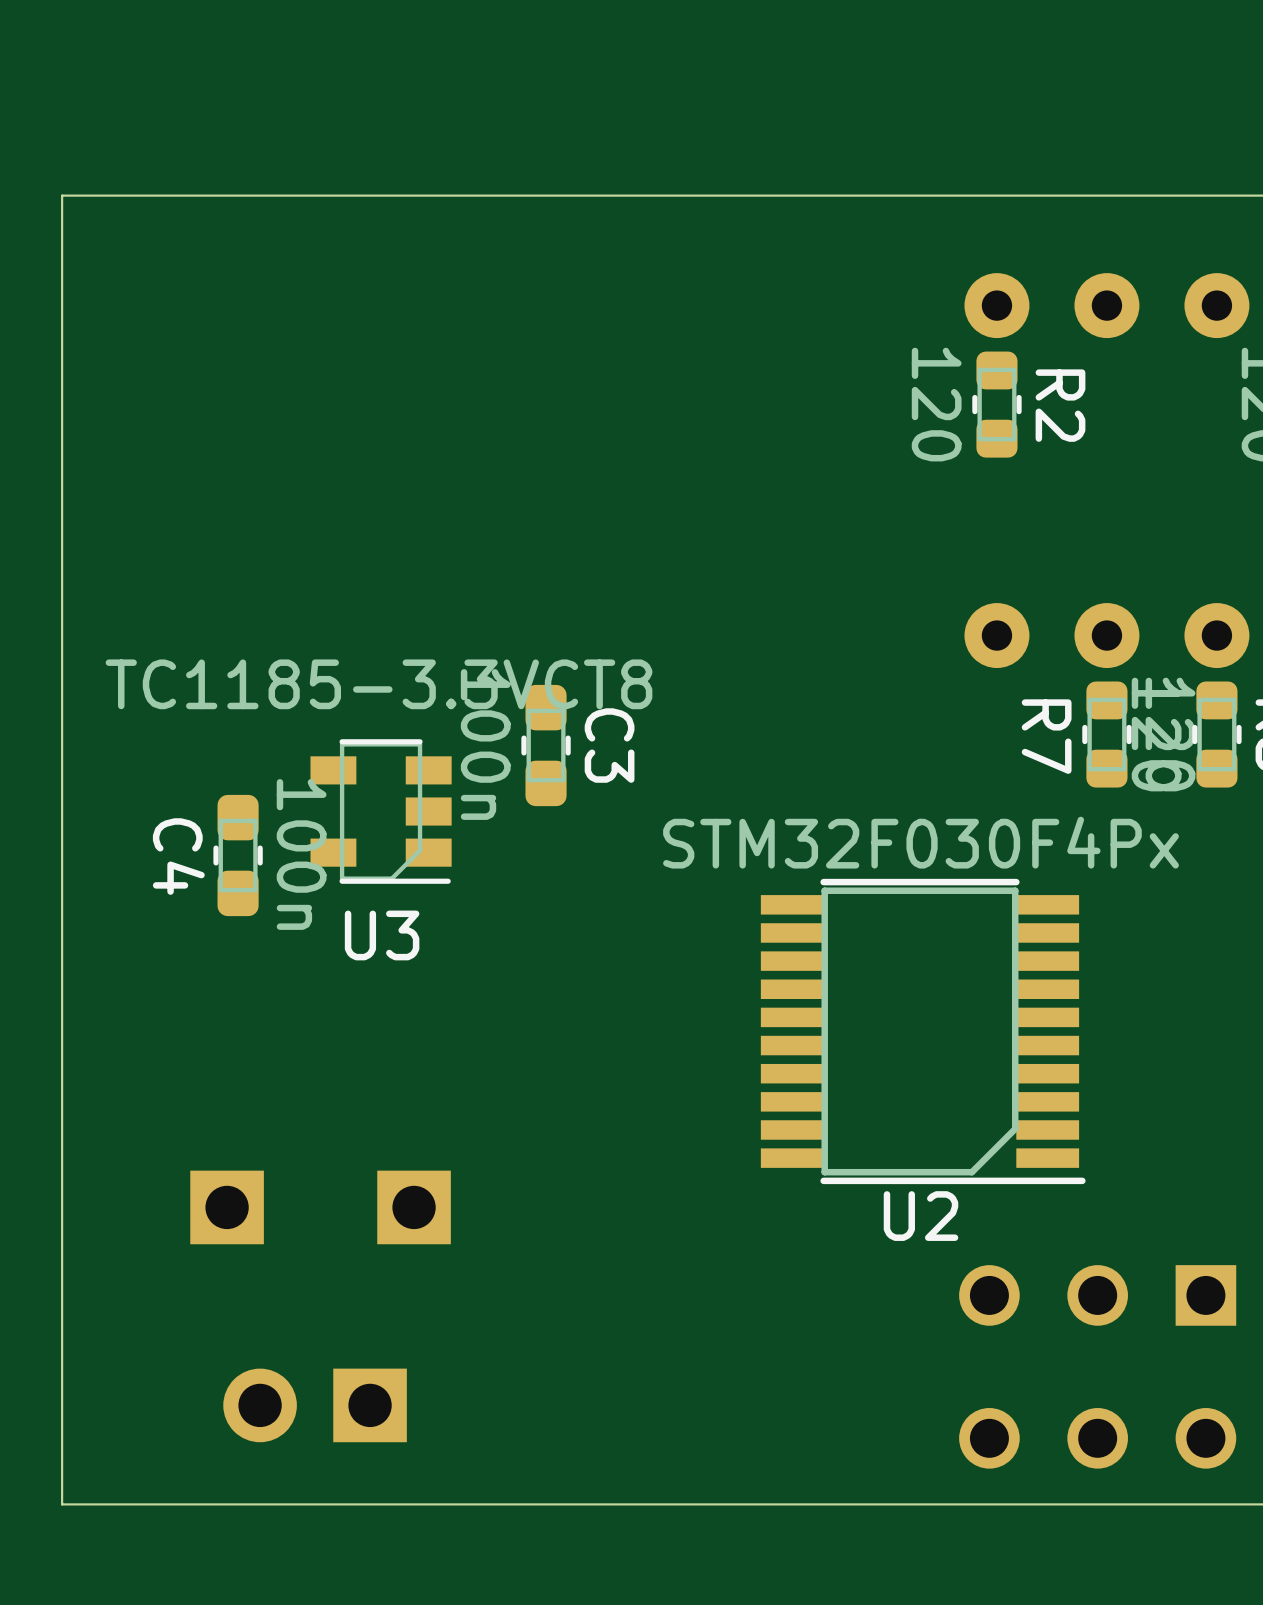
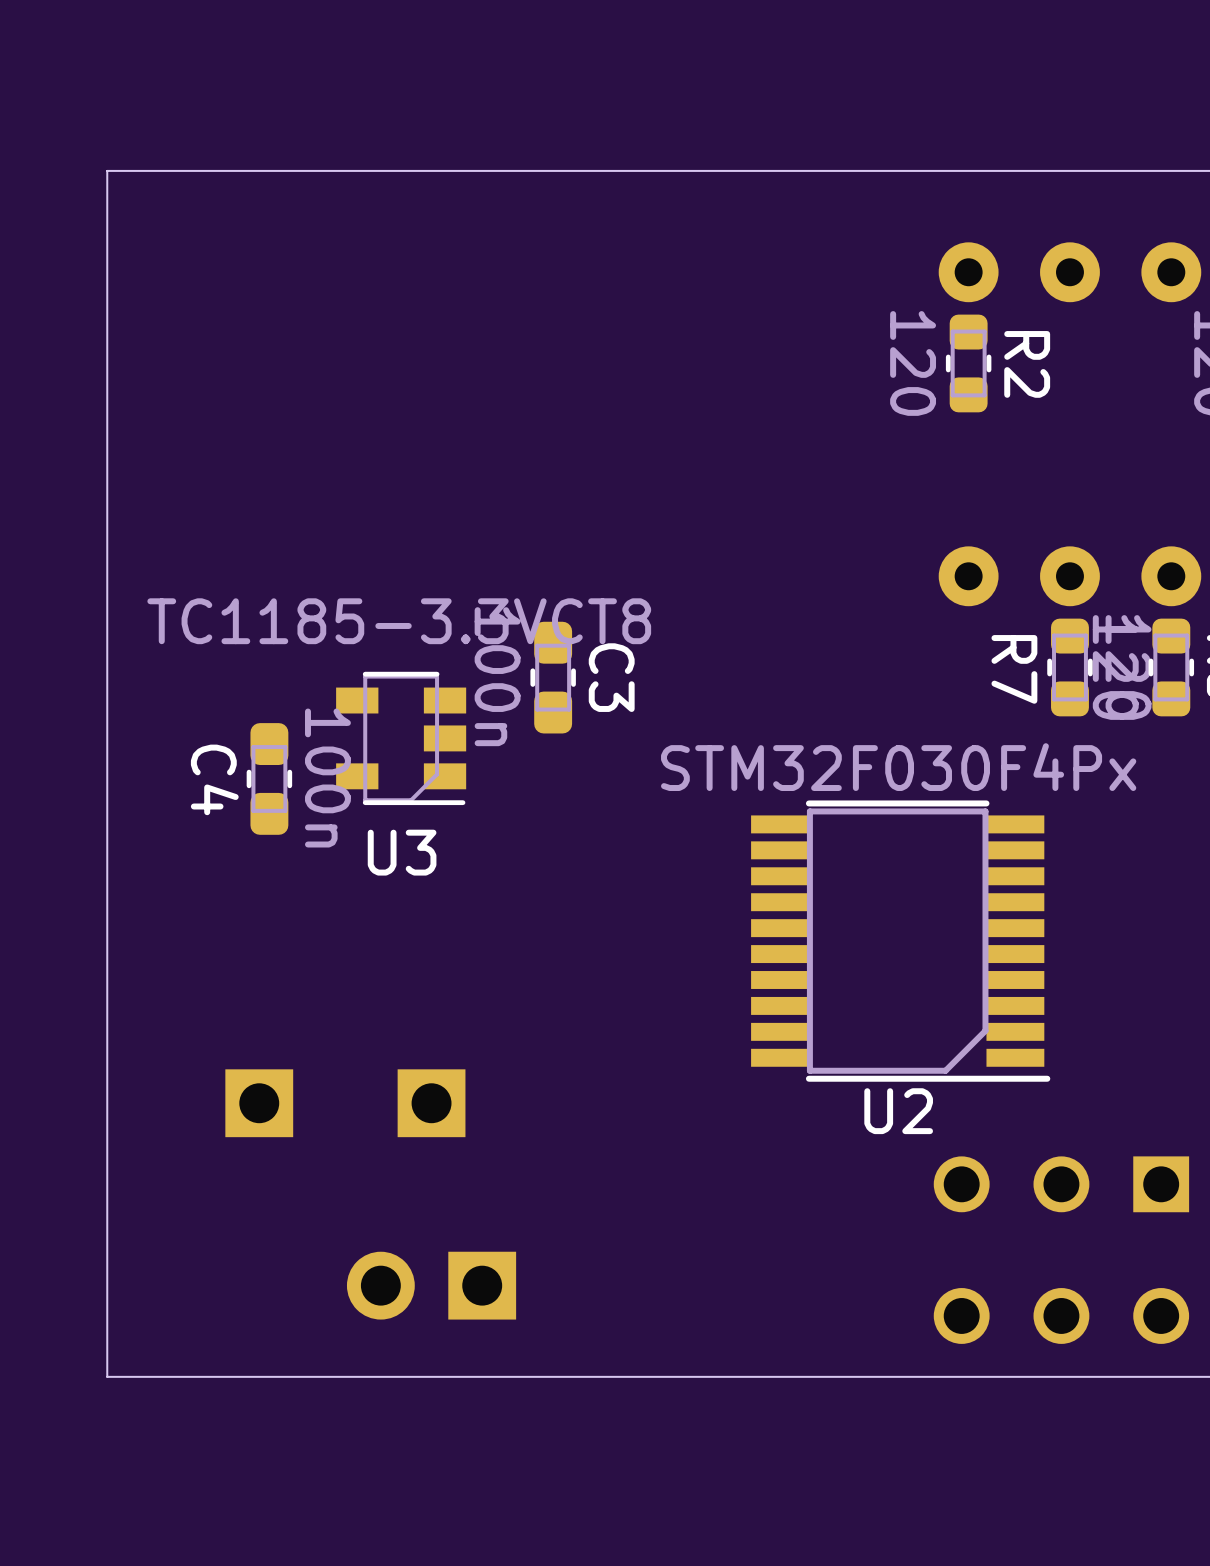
part position: (315, 1405) -> (431, 1285)

